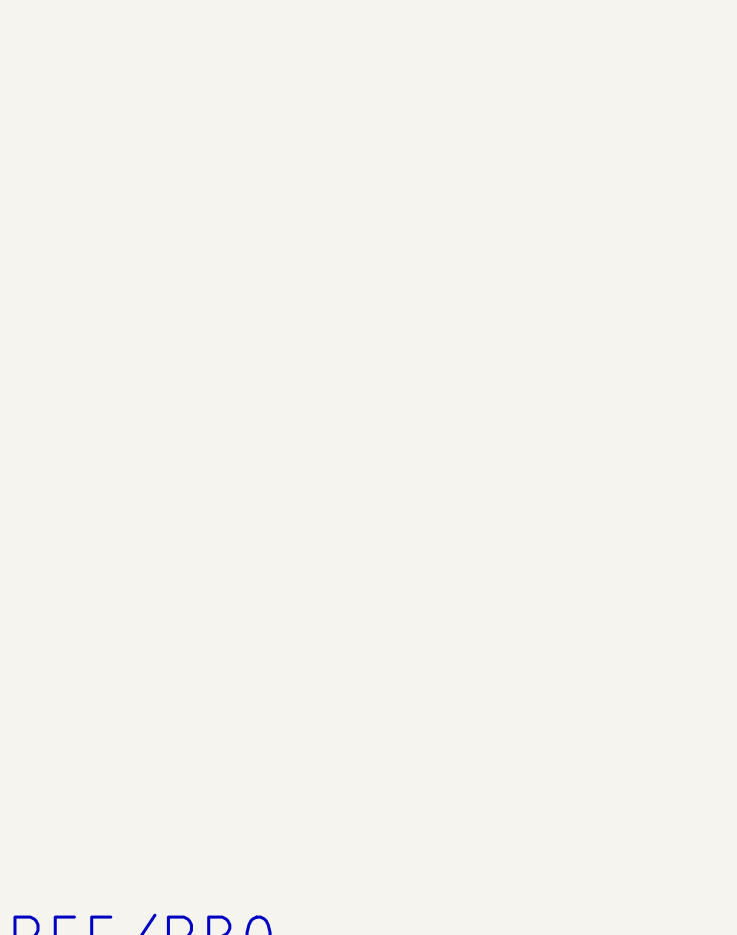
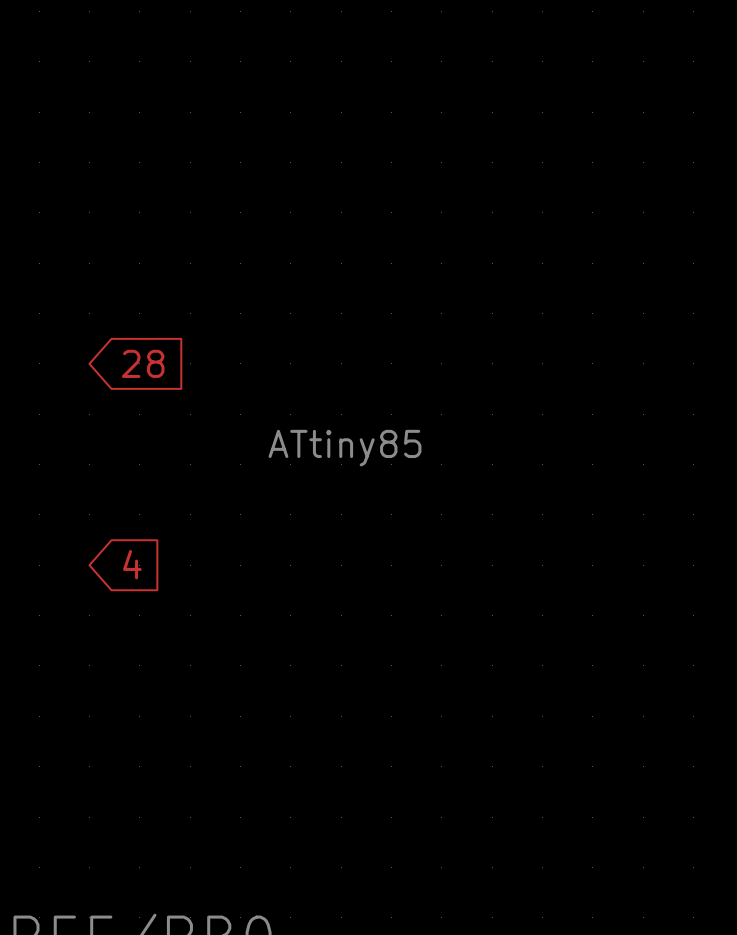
global label: none -> 28 (143, 363)
text: none -> ATtiny85 (344, 448)
global label: none -> 4 (132, 564)

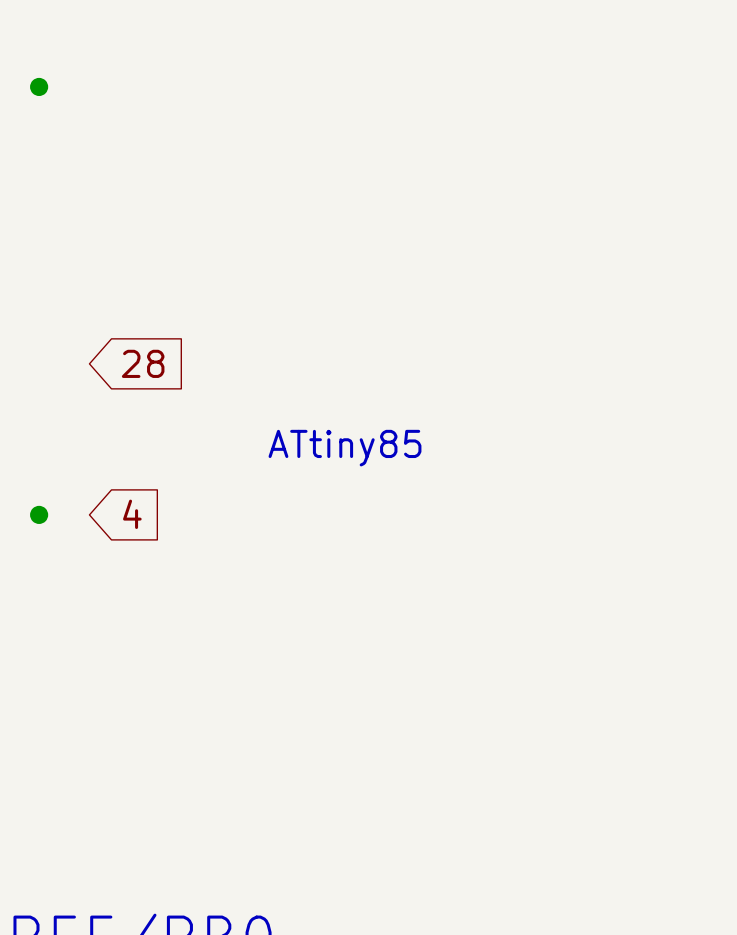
junction: none -> (39, 86)
junction: none -> (39, 514)
global label position: 4 (132, 564) -> 4 (132, 514)

